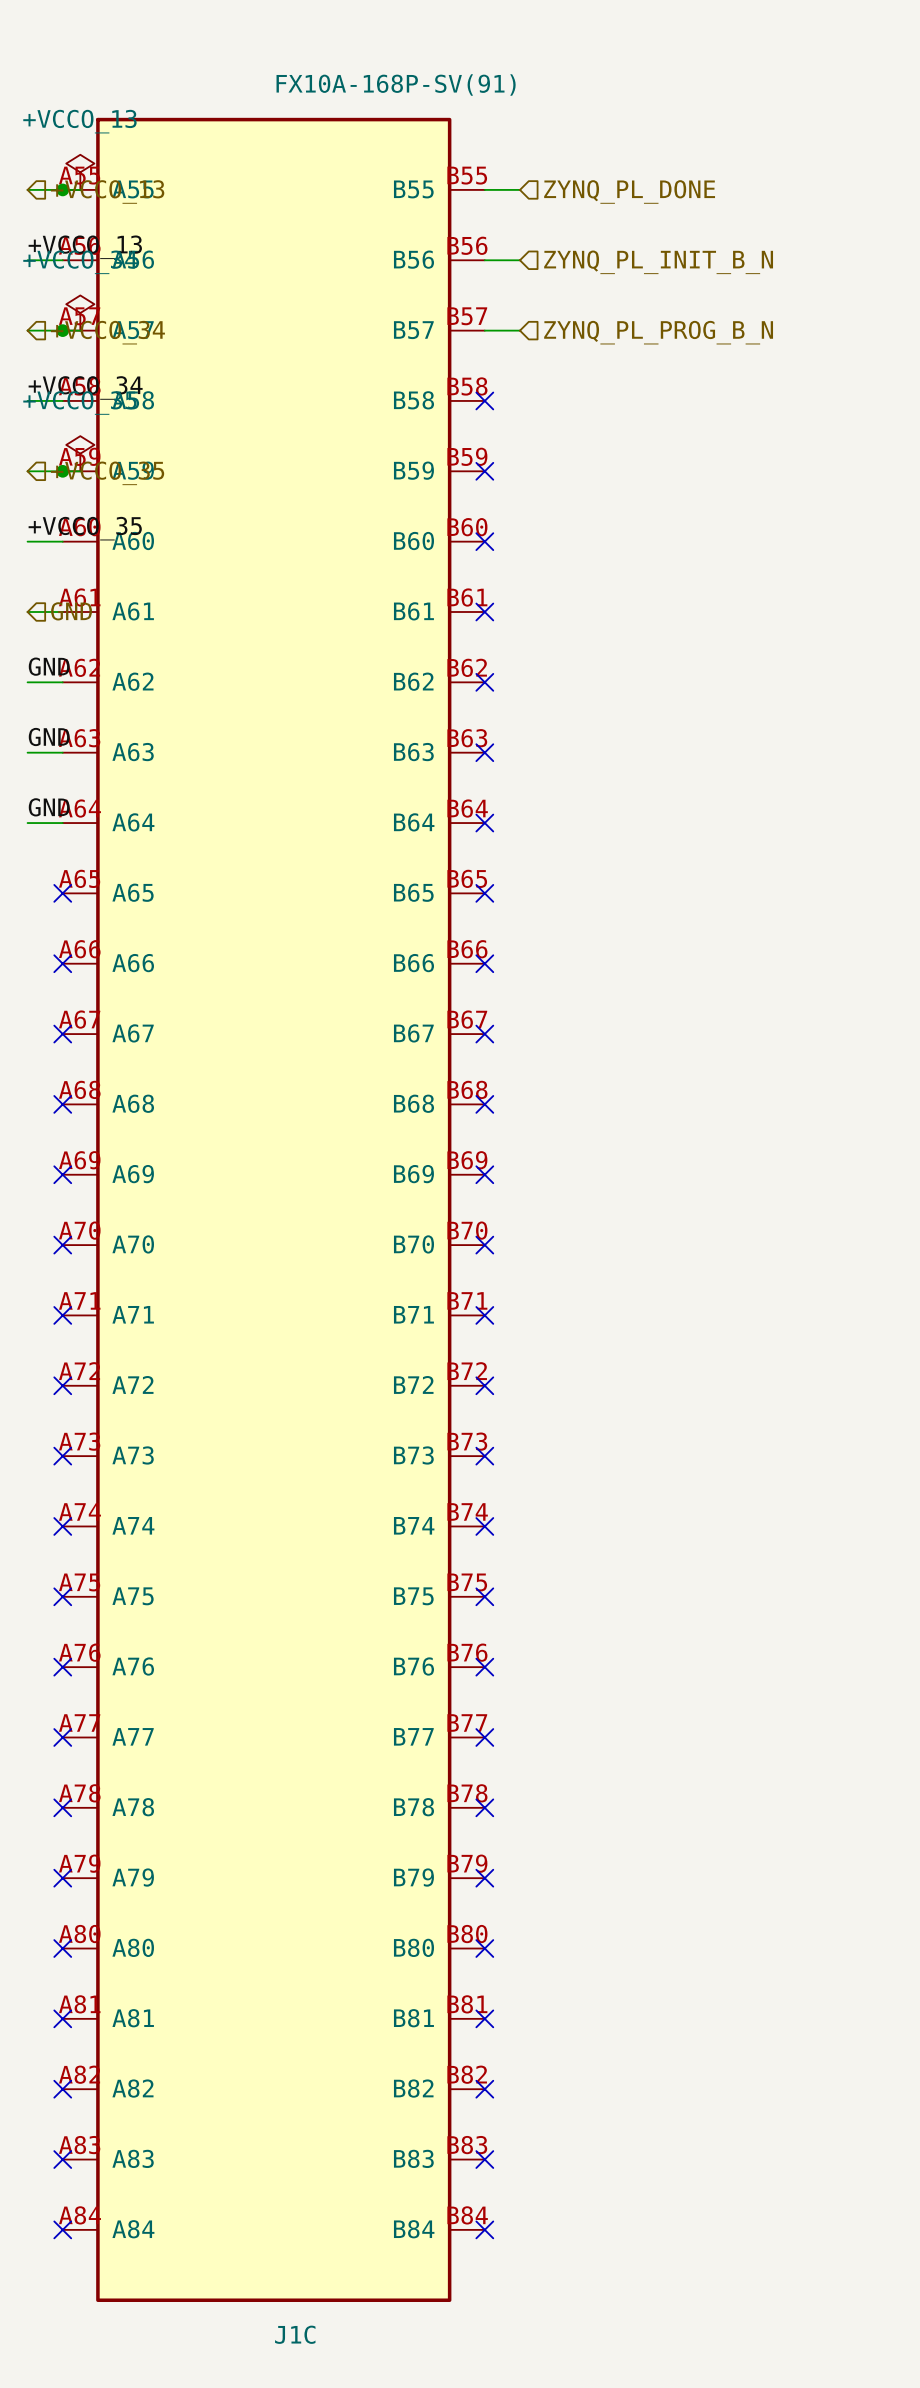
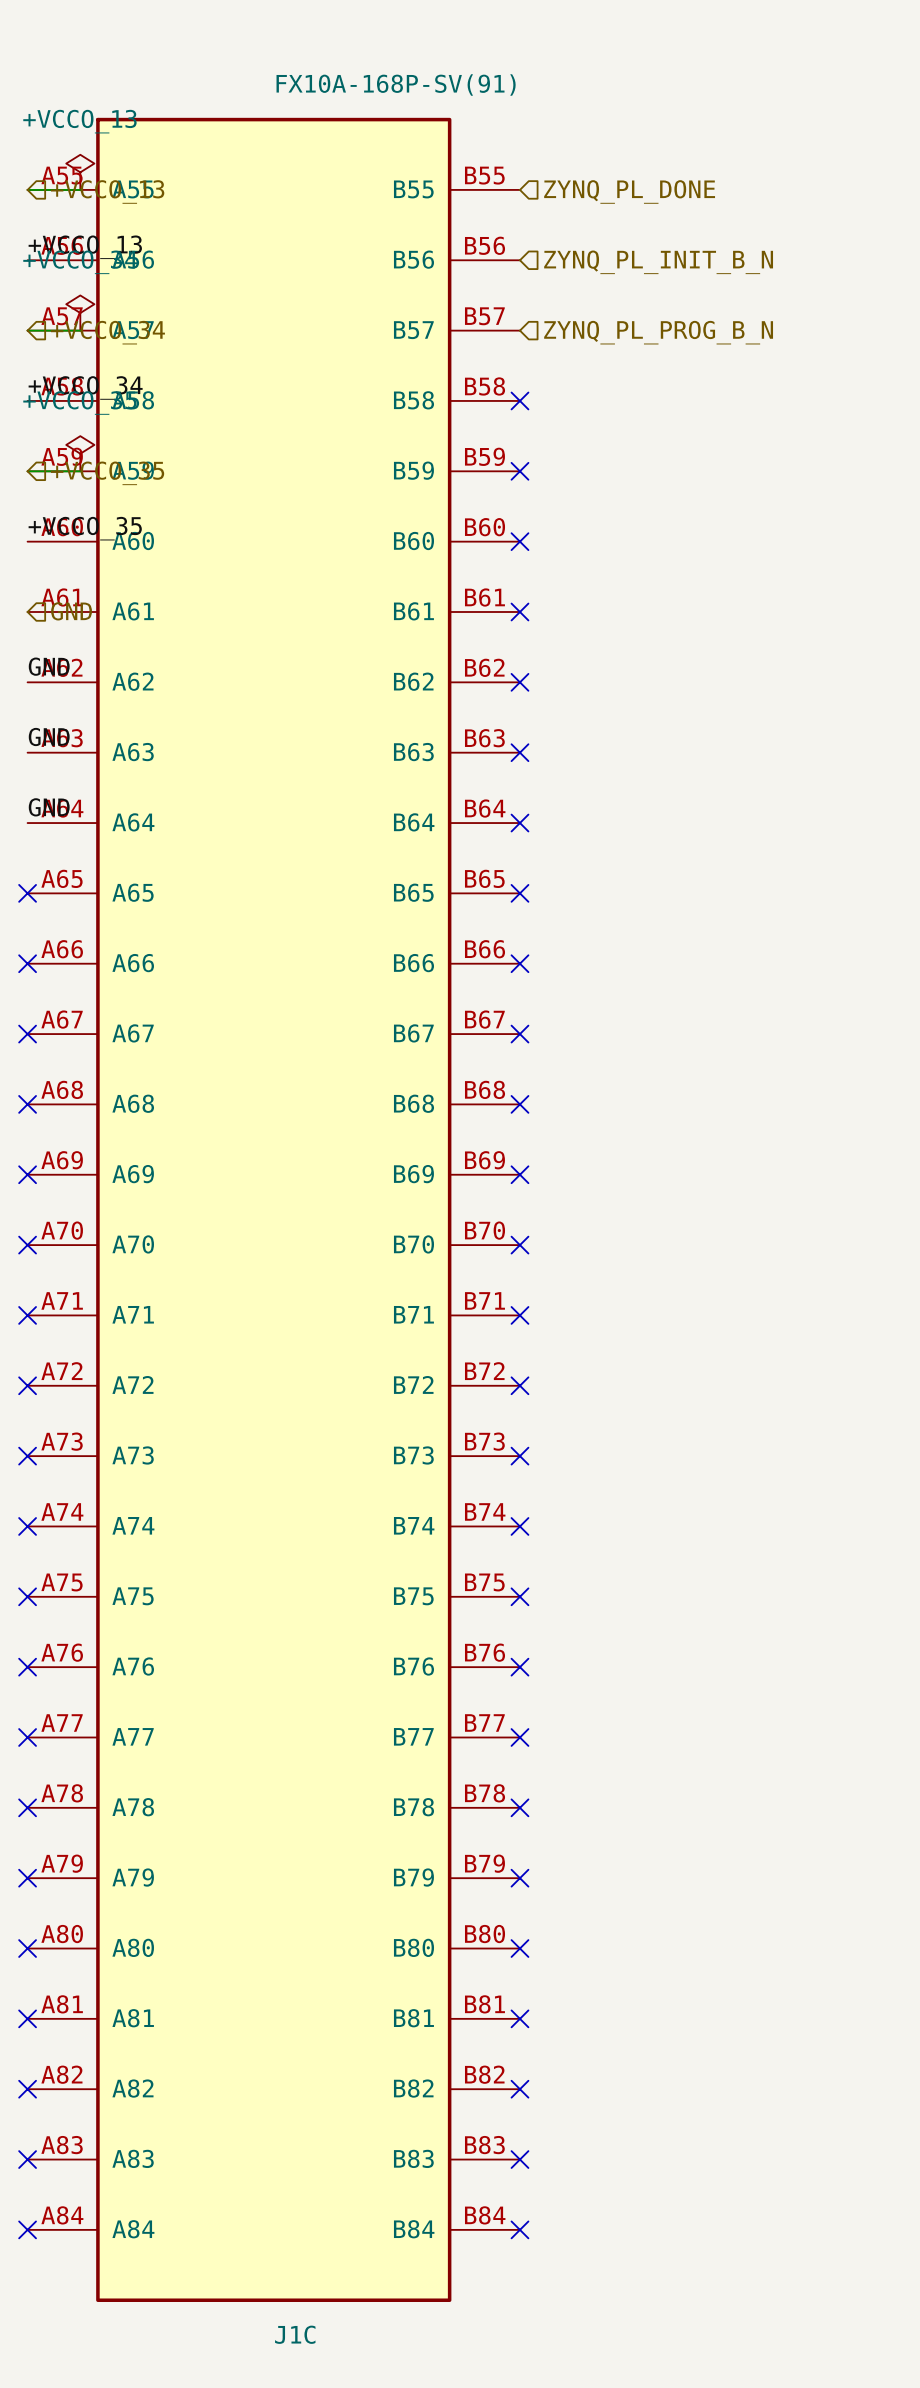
J1C symbol: [62, 117, 485, 2302] -> [27, 117, 520, 2302]
junction: (62, 189) -> none
junction: (62, 330) -> none
no-connect mark position: (484, 400) -> (519, 400)
junction: (62, 471) -> none
no-connect mark position: (484, 471) -> (519, 471)
no-connect mark position: (484, 541) -> (519, 541)
no-connect mark position: (484, 612) -> (519, 612)
no-connect mark position: (484, 682) -> (519, 682)
no-connect mark position: (484, 752) -> (519, 752)
no-connect mark position: (484, 823) -> (519, 823)
no-connect mark position: (62, 893) -> (27, 893)
no-connect mark position: (484, 893) -> (519, 893)
no-connect mark position: (62, 963) -> (27, 963)
no-connect mark position: (484, 963) -> (519, 963)
no-connect mark position: (62, 1034) -> (27, 1034)
no-connect mark position: (484, 1034) -> (519, 1034)
no-connect mark position: (62, 1104) -> (27, 1104)
no-connect mark position: (484, 1104) -> (519, 1104)
no-connect mark position: (62, 1174) -> (27, 1174)
no-connect mark position: (484, 1174) -> (519, 1174)
no-connect mark position: (62, 1245) -> (27, 1245)
no-connect mark position: (484, 1245) -> (519, 1245)
no-connect mark position: (62, 1315) -> (27, 1315)
no-connect mark position: (484, 1315) -> (519, 1315)
no-connect mark position: (62, 1385) -> (27, 1385)
no-connect mark position: (484, 1385) -> (519, 1385)
no-connect mark position: (62, 1456) -> (27, 1456)
no-connect mark position: (484, 1456) -> (519, 1456)
no-connect mark position: (62, 1526) -> (27, 1526)
no-connect mark position: (484, 1526) -> (519, 1526)
no-connect mark position: (62, 1596) -> (27, 1596)
no-connect mark position: (484, 1596) -> (519, 1596)
no-connect mark position: (62, 1667) -> (27, 1667)
no-connect mark position: (484, 1667) -> (519, 1667)
no-connect mark position: (62, 1737) -> (27, 1737)
no-connect mark position: (484, 1737) -> (519, 1737)
no-connect mark position: (62, 1807) -> (27, 1807)
no-connect mark position: (484, 1807) -> (519, 1807)
no-connect mark position: (62, 1878) -> (27, 1878)
no-connect mark position: (484, 1878) -> (519, 1878)
no-connect mark position: (62, 1948) -> (27, 1948)
no-connect mark position: (484, 1948) -> (519, 1948)
no-connect mark position: (62, 2018) -> (27, 2018)
no-connect mark position: (484, 2018) -> (519, 2018)
no-connect mark position: (62, 2089) -> (27, 2089)
no-connect mark position: (484, 2089) -> (519, 2089)
no-connect mark position: (62, 2159) -> (27, 2159)
no-connect mark position: (484, 2159) -> (519, 2159)
no-connect mark position: (62, 2229) -> (27, 2229)
no-connect mark position: (484, 2229) -> (519, 2229)

